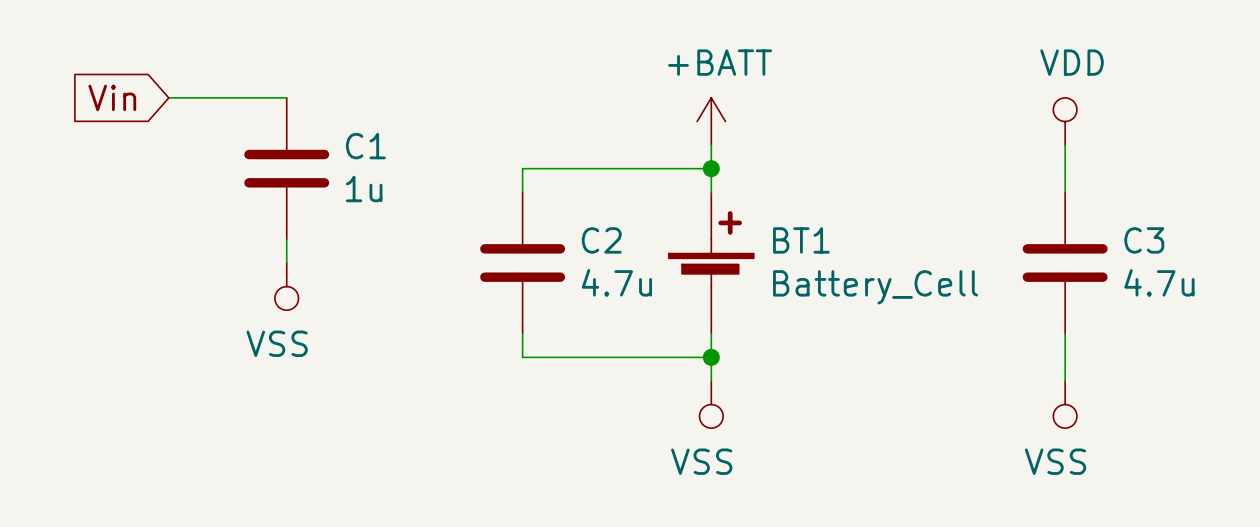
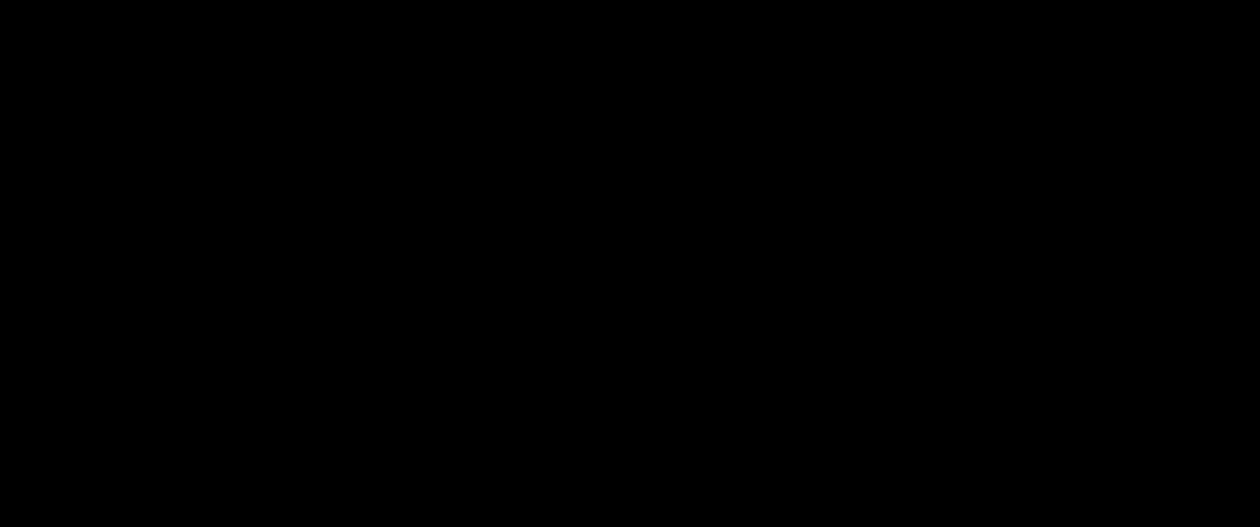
global label: Vin (112, 97) -> none
wire: (168, 97) (286, 97) -> none
power symbol: +BATT (711, 121) -> none
power symbol: VDD (1065, 121) -> none
wire: (711, 145) (711, 192) -> none
wire: (1065, 145) (1065, 192) -> none
C1: 1u (286, 168) -> none
wire: (711, 168) (522, 168) (522, 192) -> none
junction: (711, 168) -> none
wire: (286, 239) (286, 263) -> none
C2: 4.7u (522, 263) -> none
BT1: Battery_Cell (711, 263) -> none
C3: 4.7u (1065, 263) -> none
power symbol: VSS (286, 286) -> none
wire: (522, 333) (522, 357) (711, 357) -> none
wire: (711, 333) (711, 380) -> none
wire: (1065, 333) (1065, 380) -> none
junction: (711, 357) -> none
power symbol: VSS (711, 404) -> none
power symbol: VSS (1065, 404) -> none

